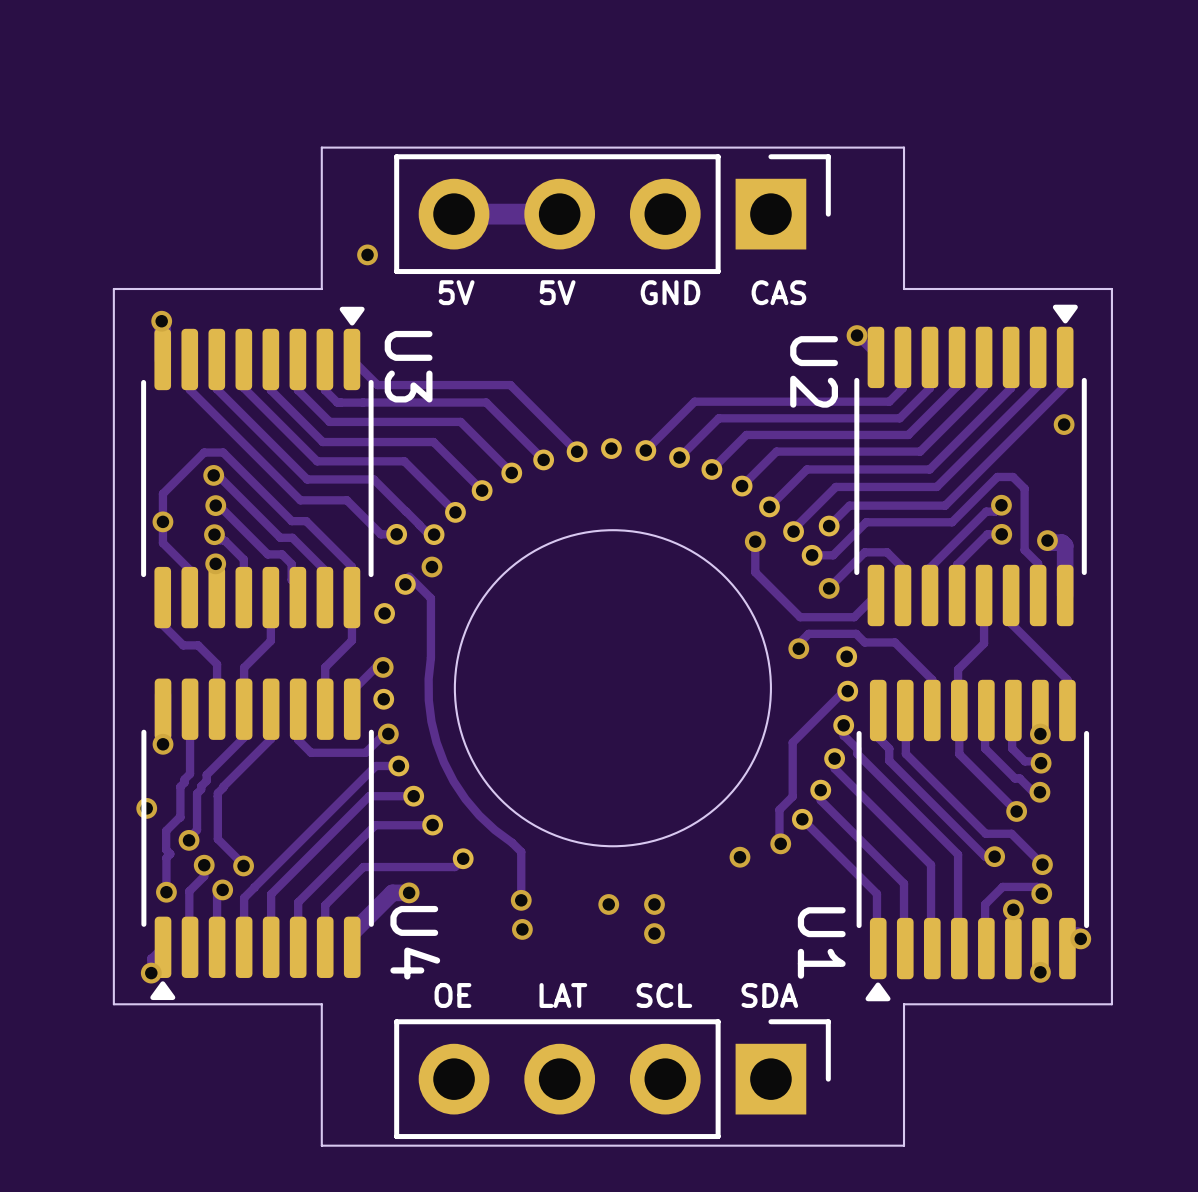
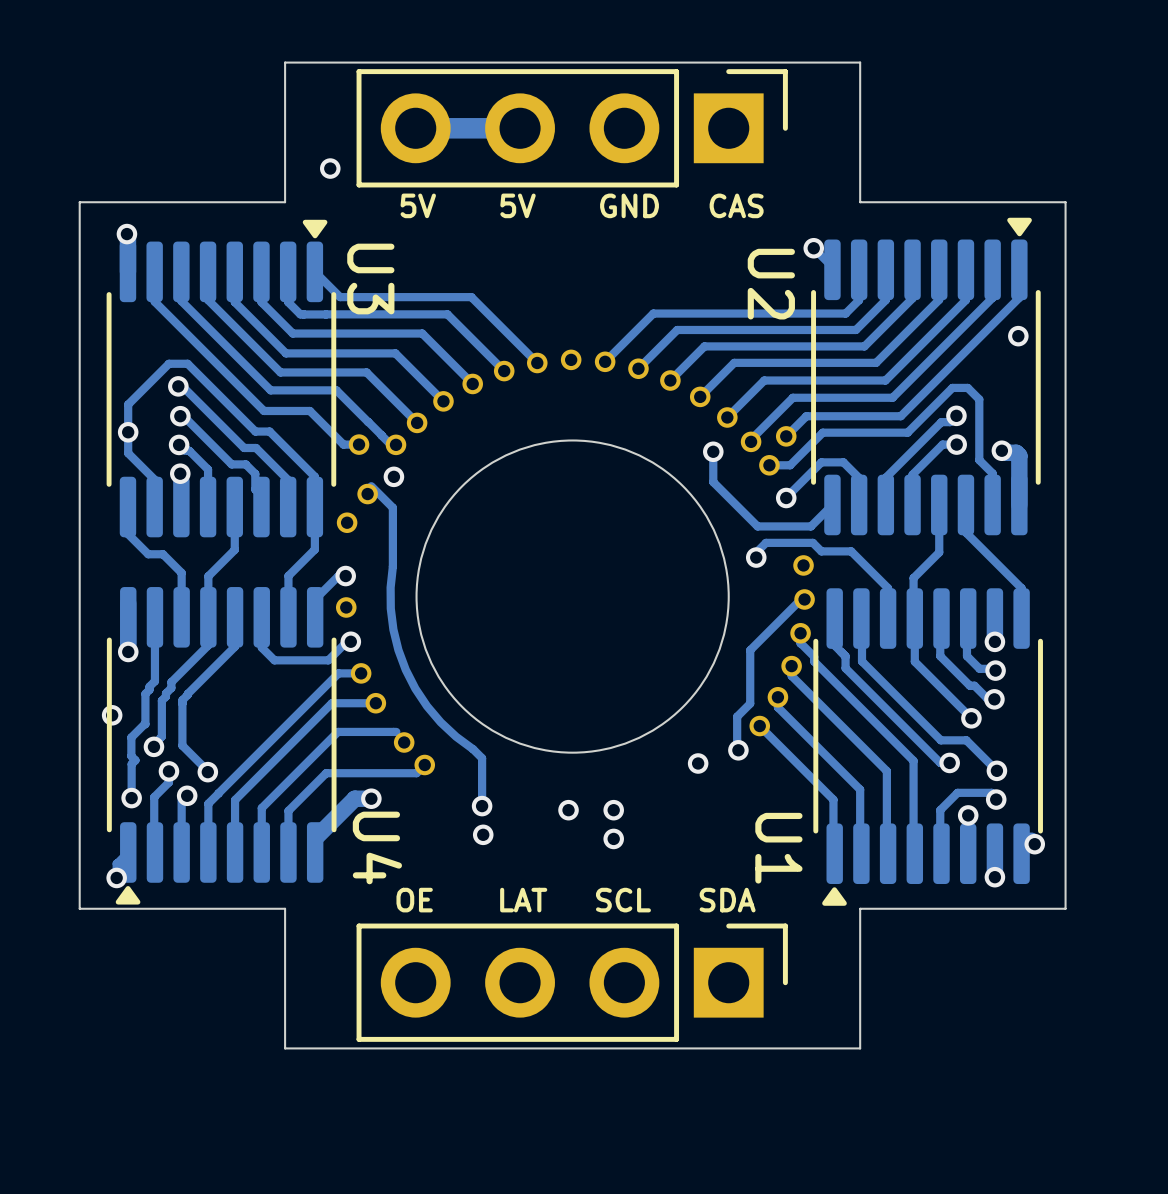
part position: (432, 825) -> (404, 742)

